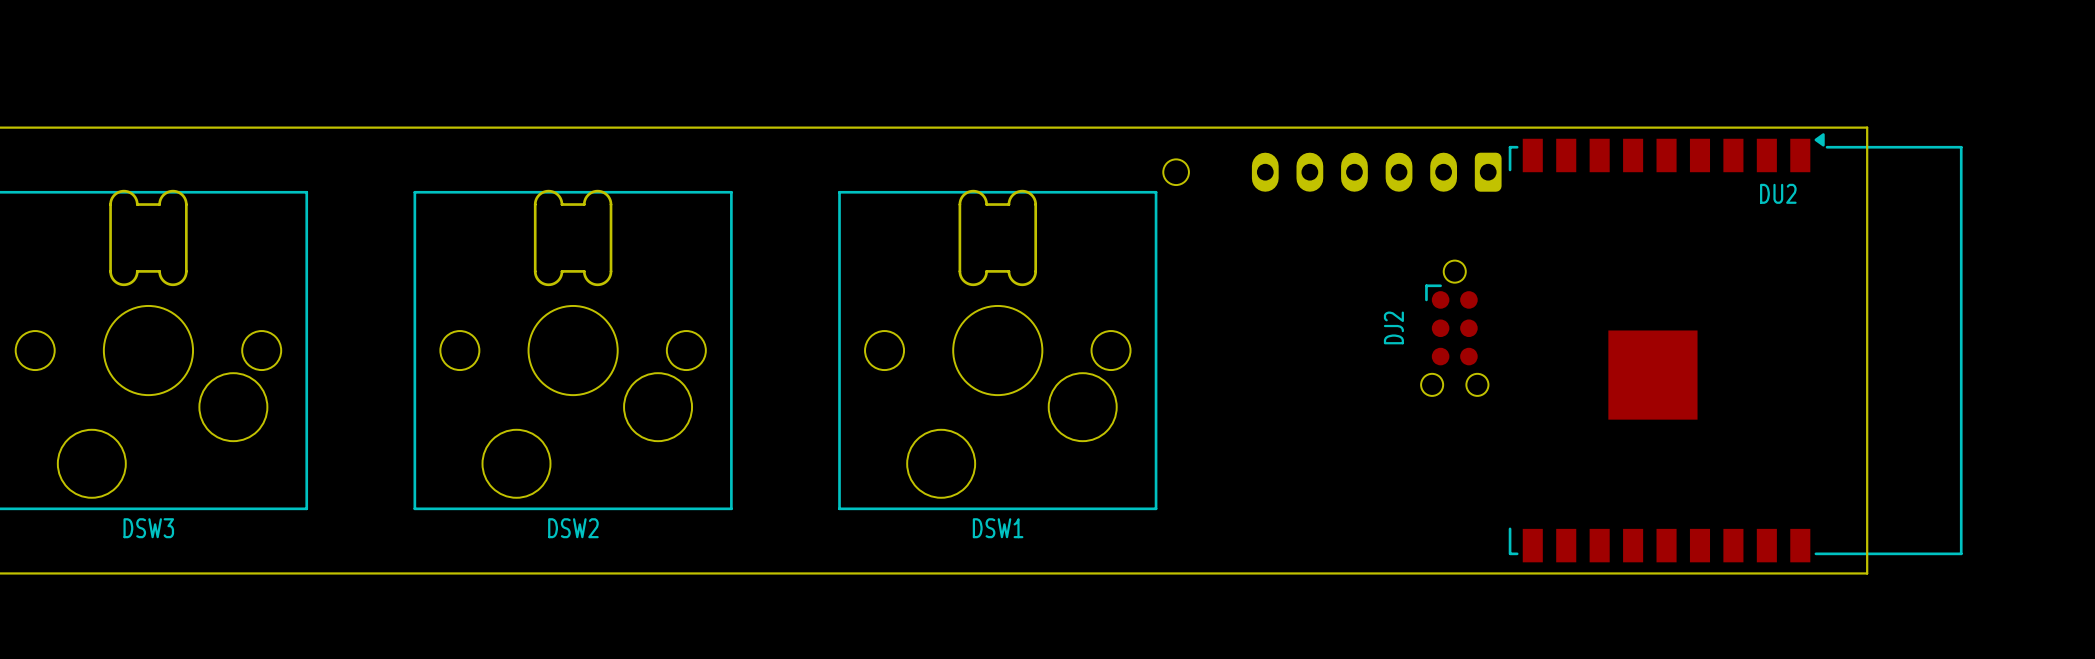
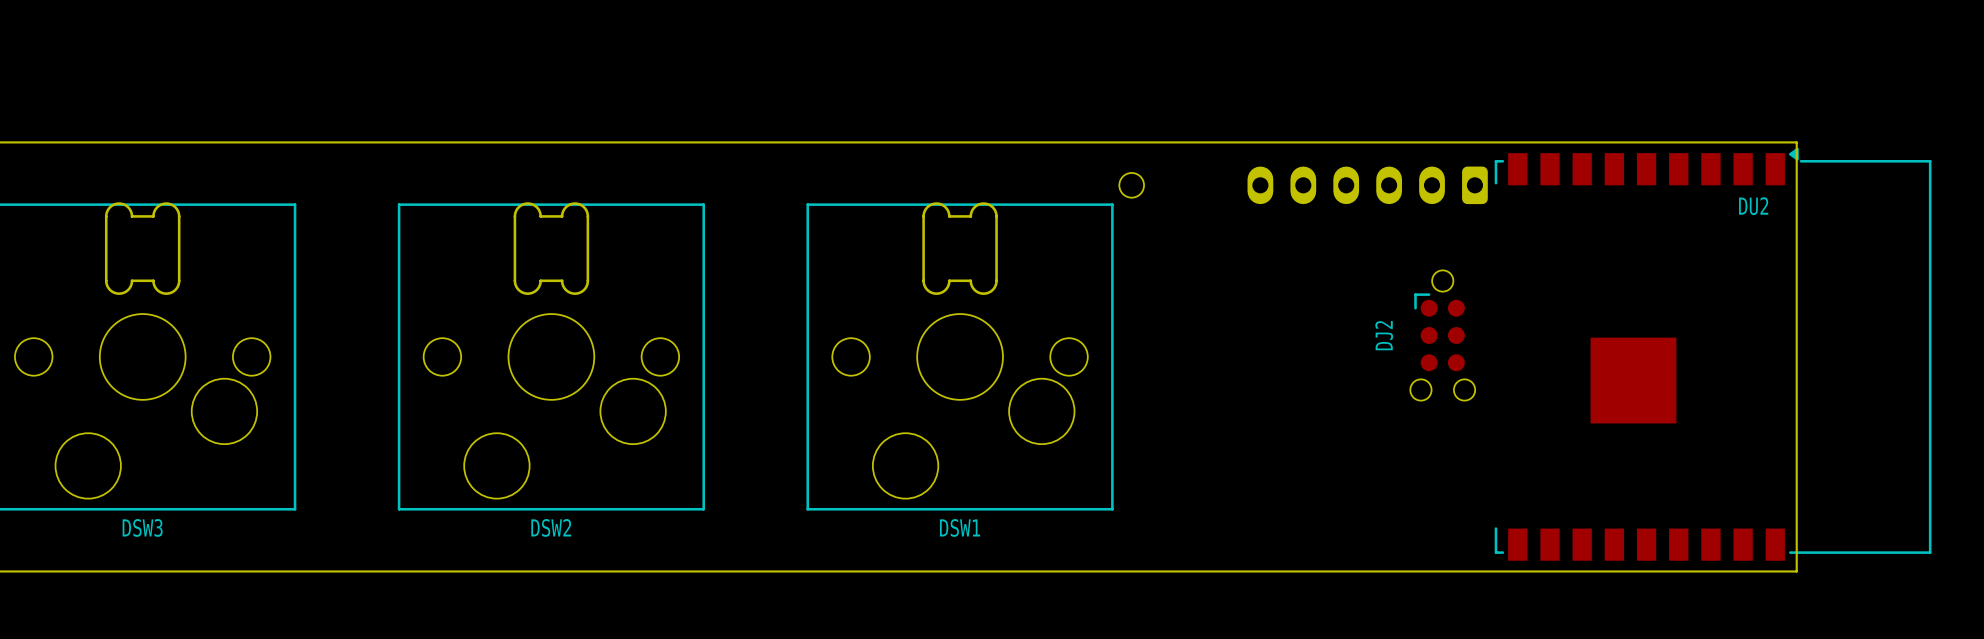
part position: (1376, 172) -> (1367, 185)
DJ2 position: (1454, 328) -> (1442, 335)
DU2 position: (1735, 347) -> (1713, 354)

